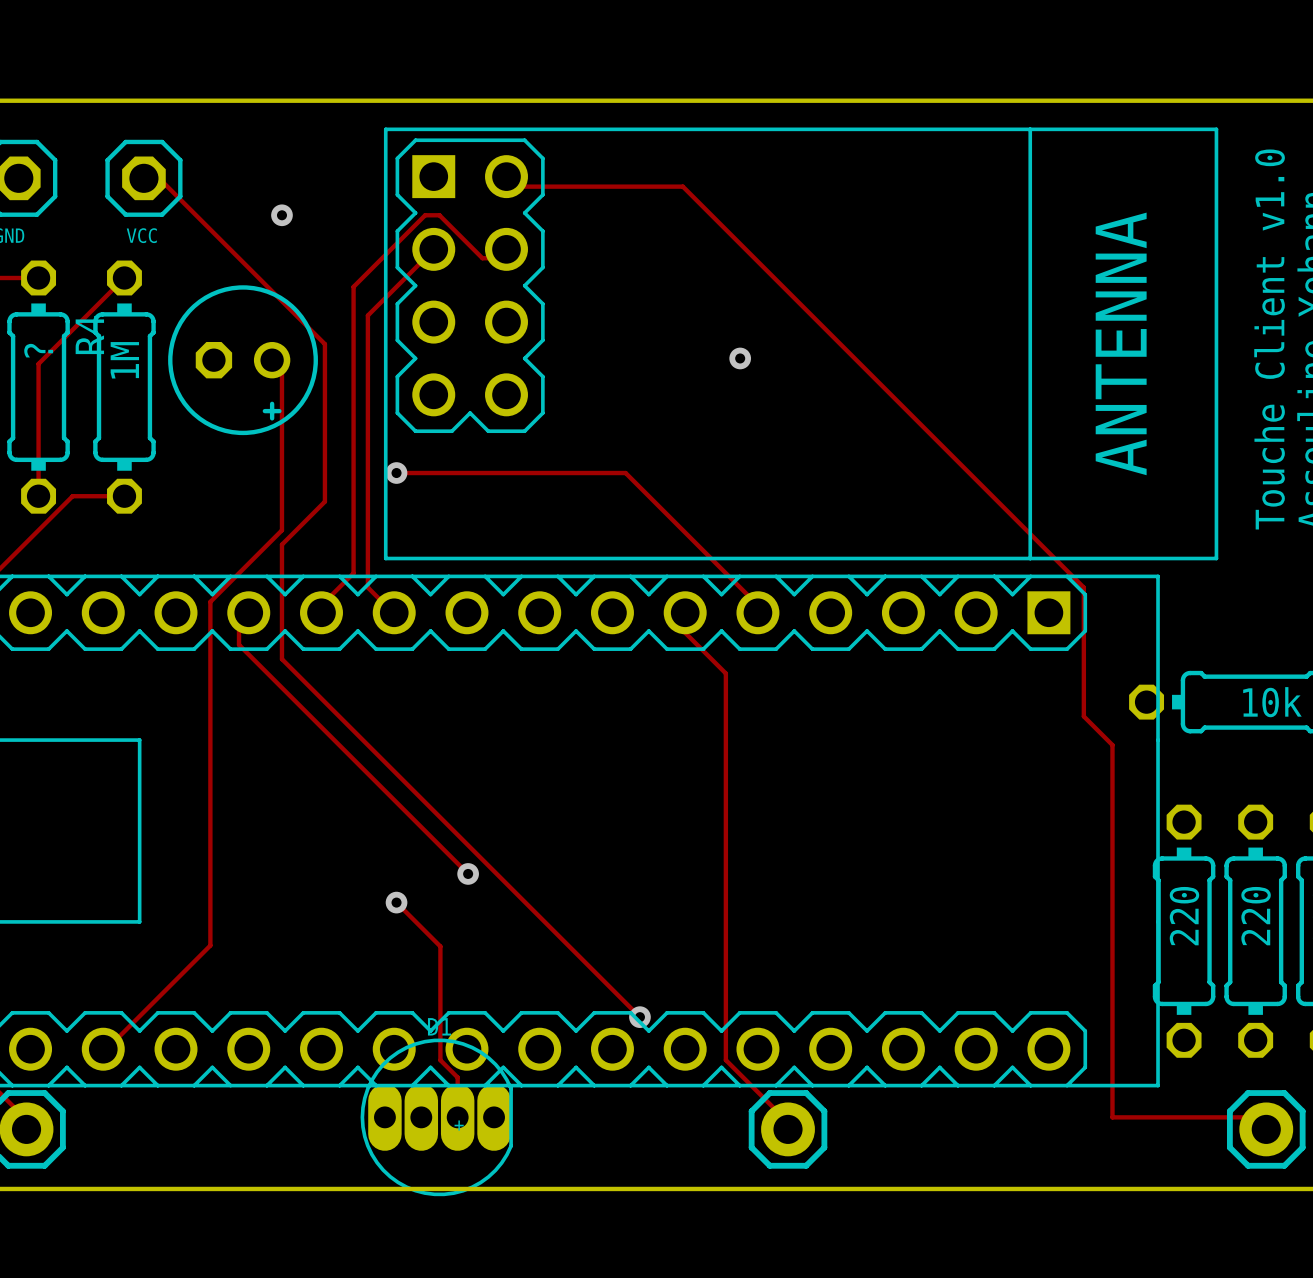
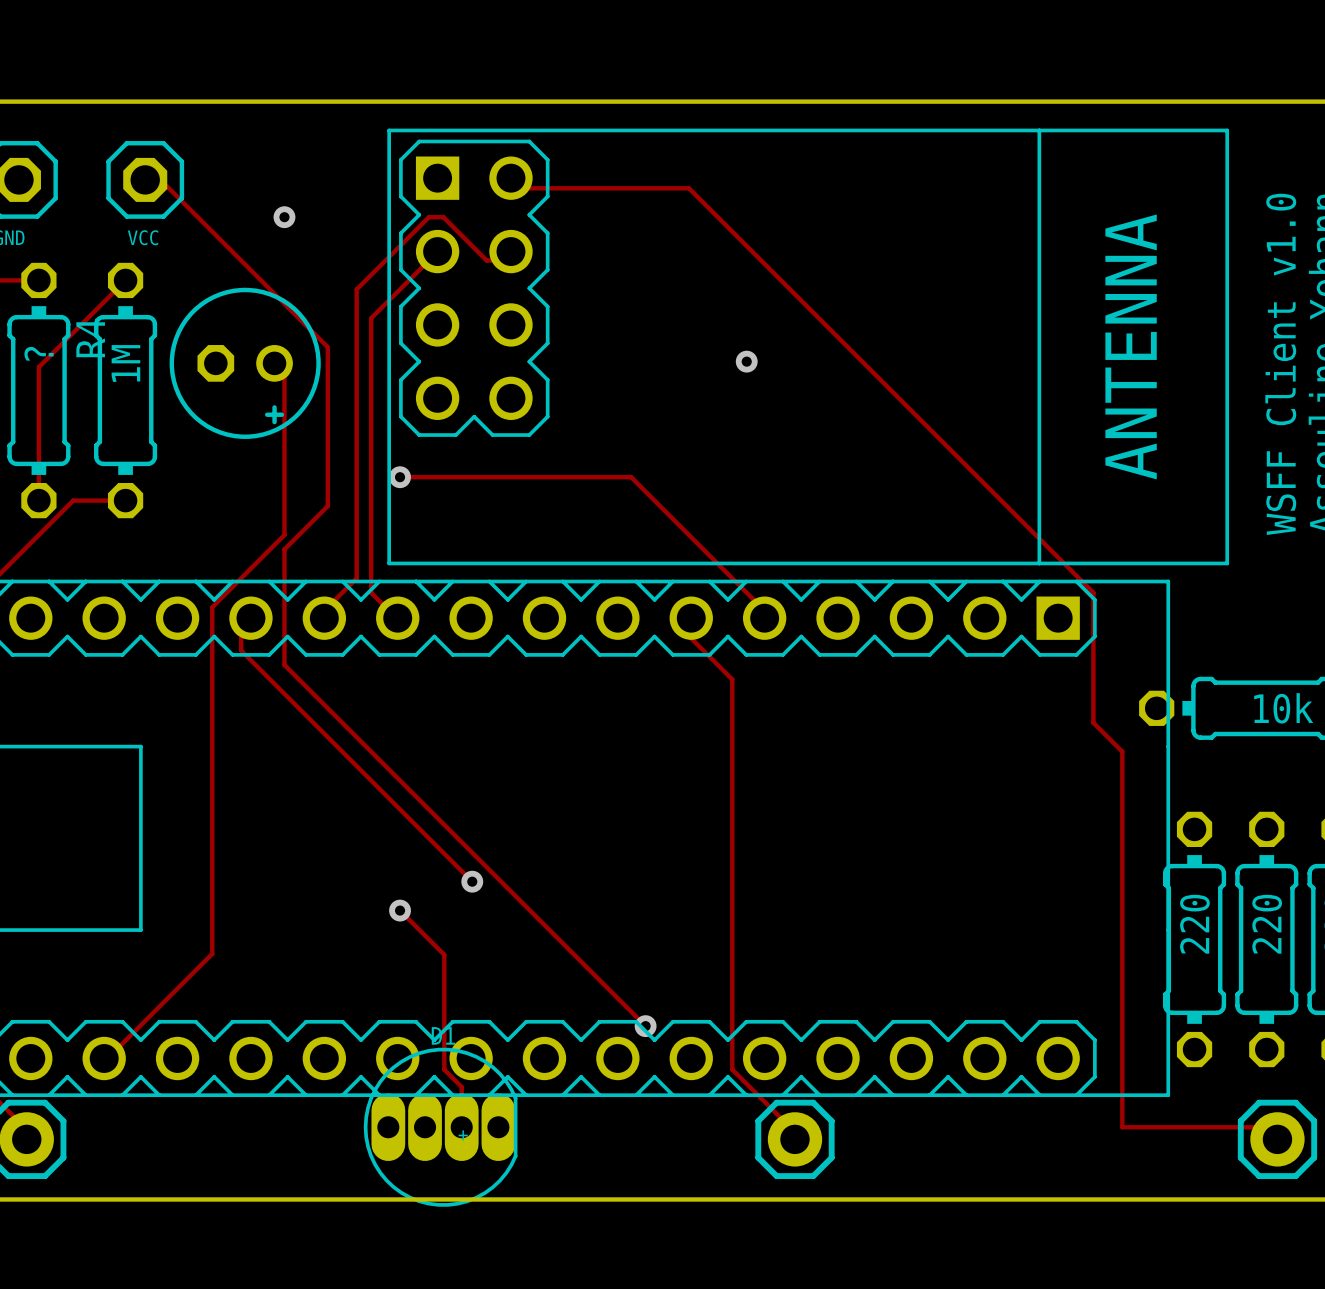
text: Touche Client v1.0 (1269, 339) -> WSFF Client v1.0 (1280, 364)

